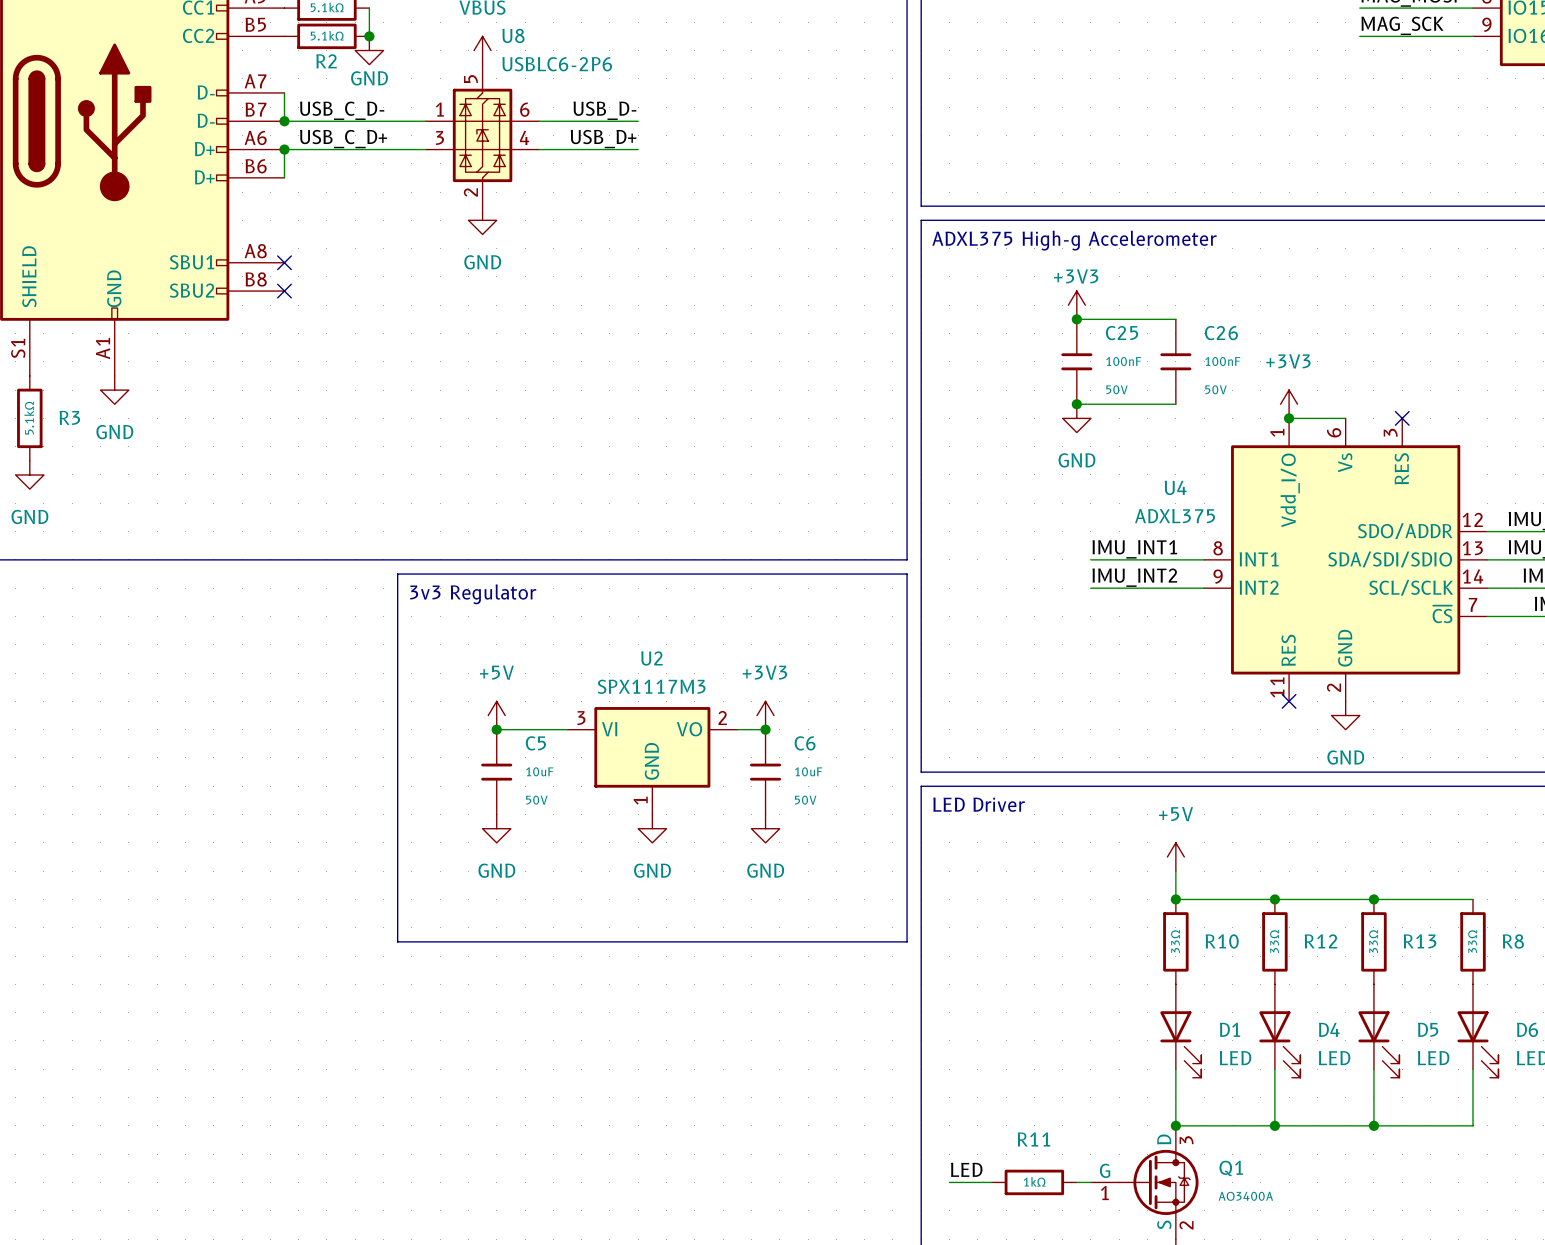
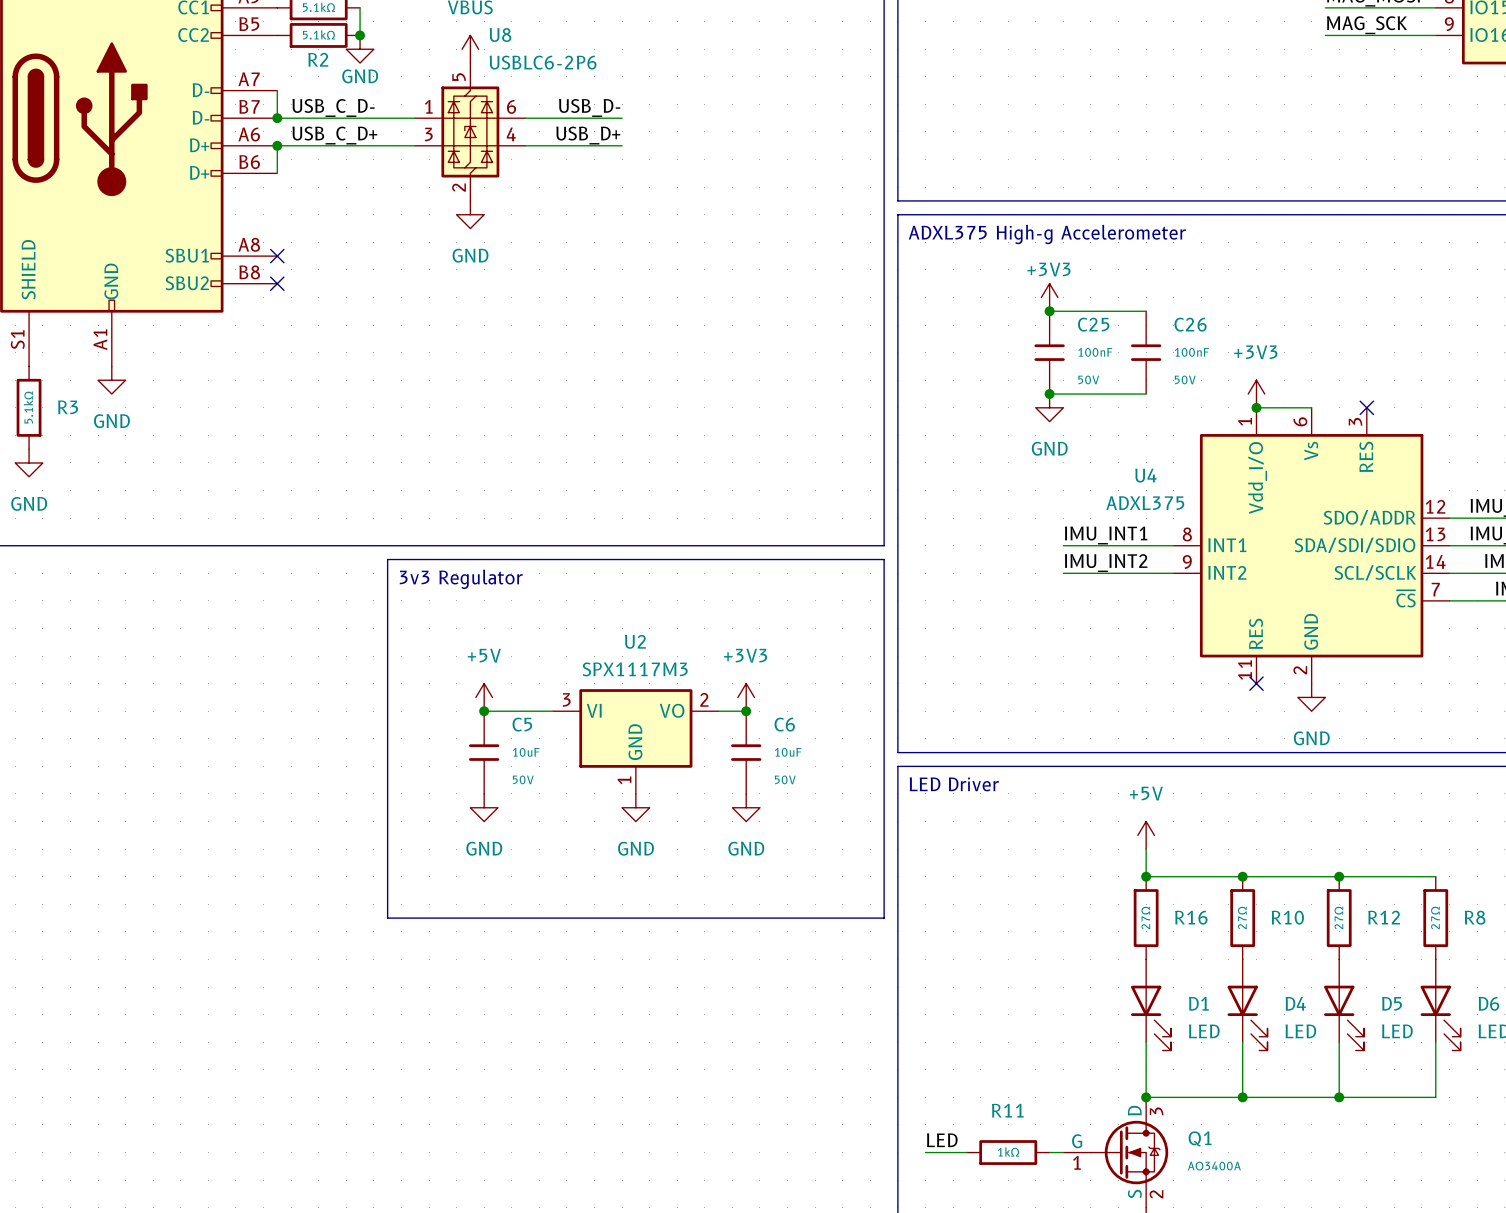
R10 value: 33Ω (1175, 941) -> 27Ω (1145, 917)
R10 name: R10 (1222, 941) -> R16 (1191, 917)
R12 value: 33Ω (1274, 941) -> 27Ω (1242, 917)
R12 name: R12 (1320, 941) -> R10 (1287, 917)
R13 value: 33Ω (1373, 941) -> 27Ω (1338, 917)
R13 name: R13 (1420, 941) -> R12 (1384, 917)
R8 value: 33Ω (1472, 941) -> 27Ω (1435, 917)

